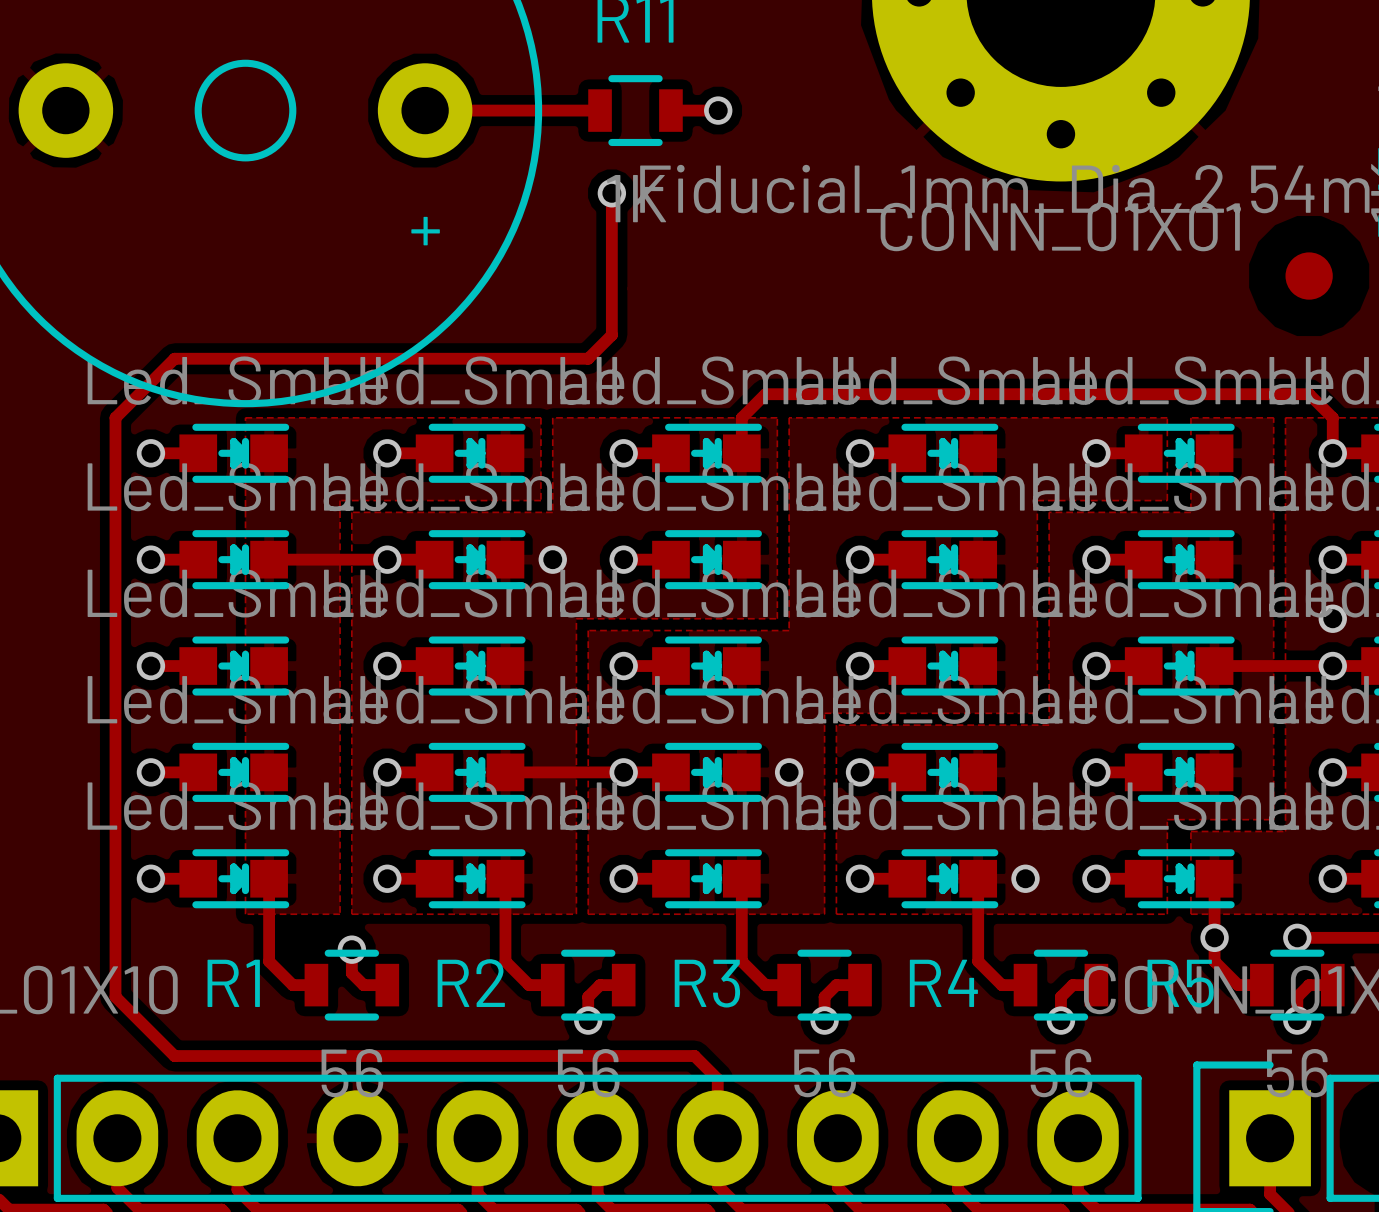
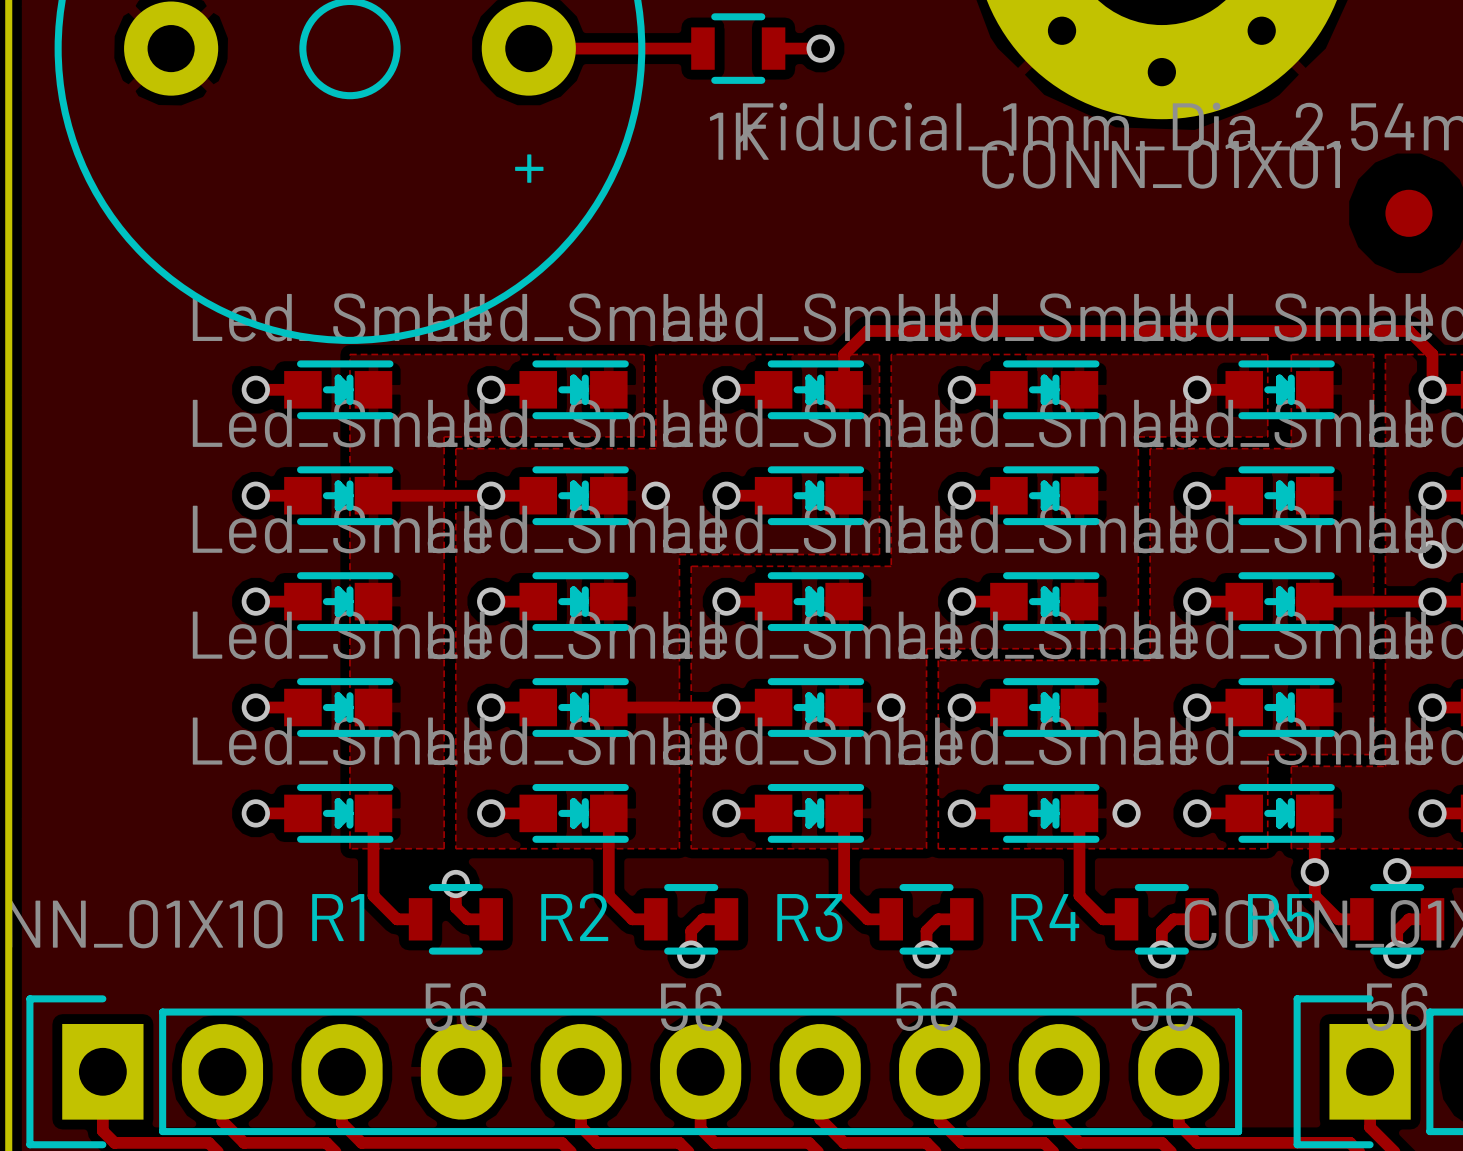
track: (611, 193) (611, 335) (588, 358) (174, 358) (115, 417) (115, 996) (174, 1056) (694, 1056) (717, 1079) (717, 1138) -> none
via: (611, 193) -> none

